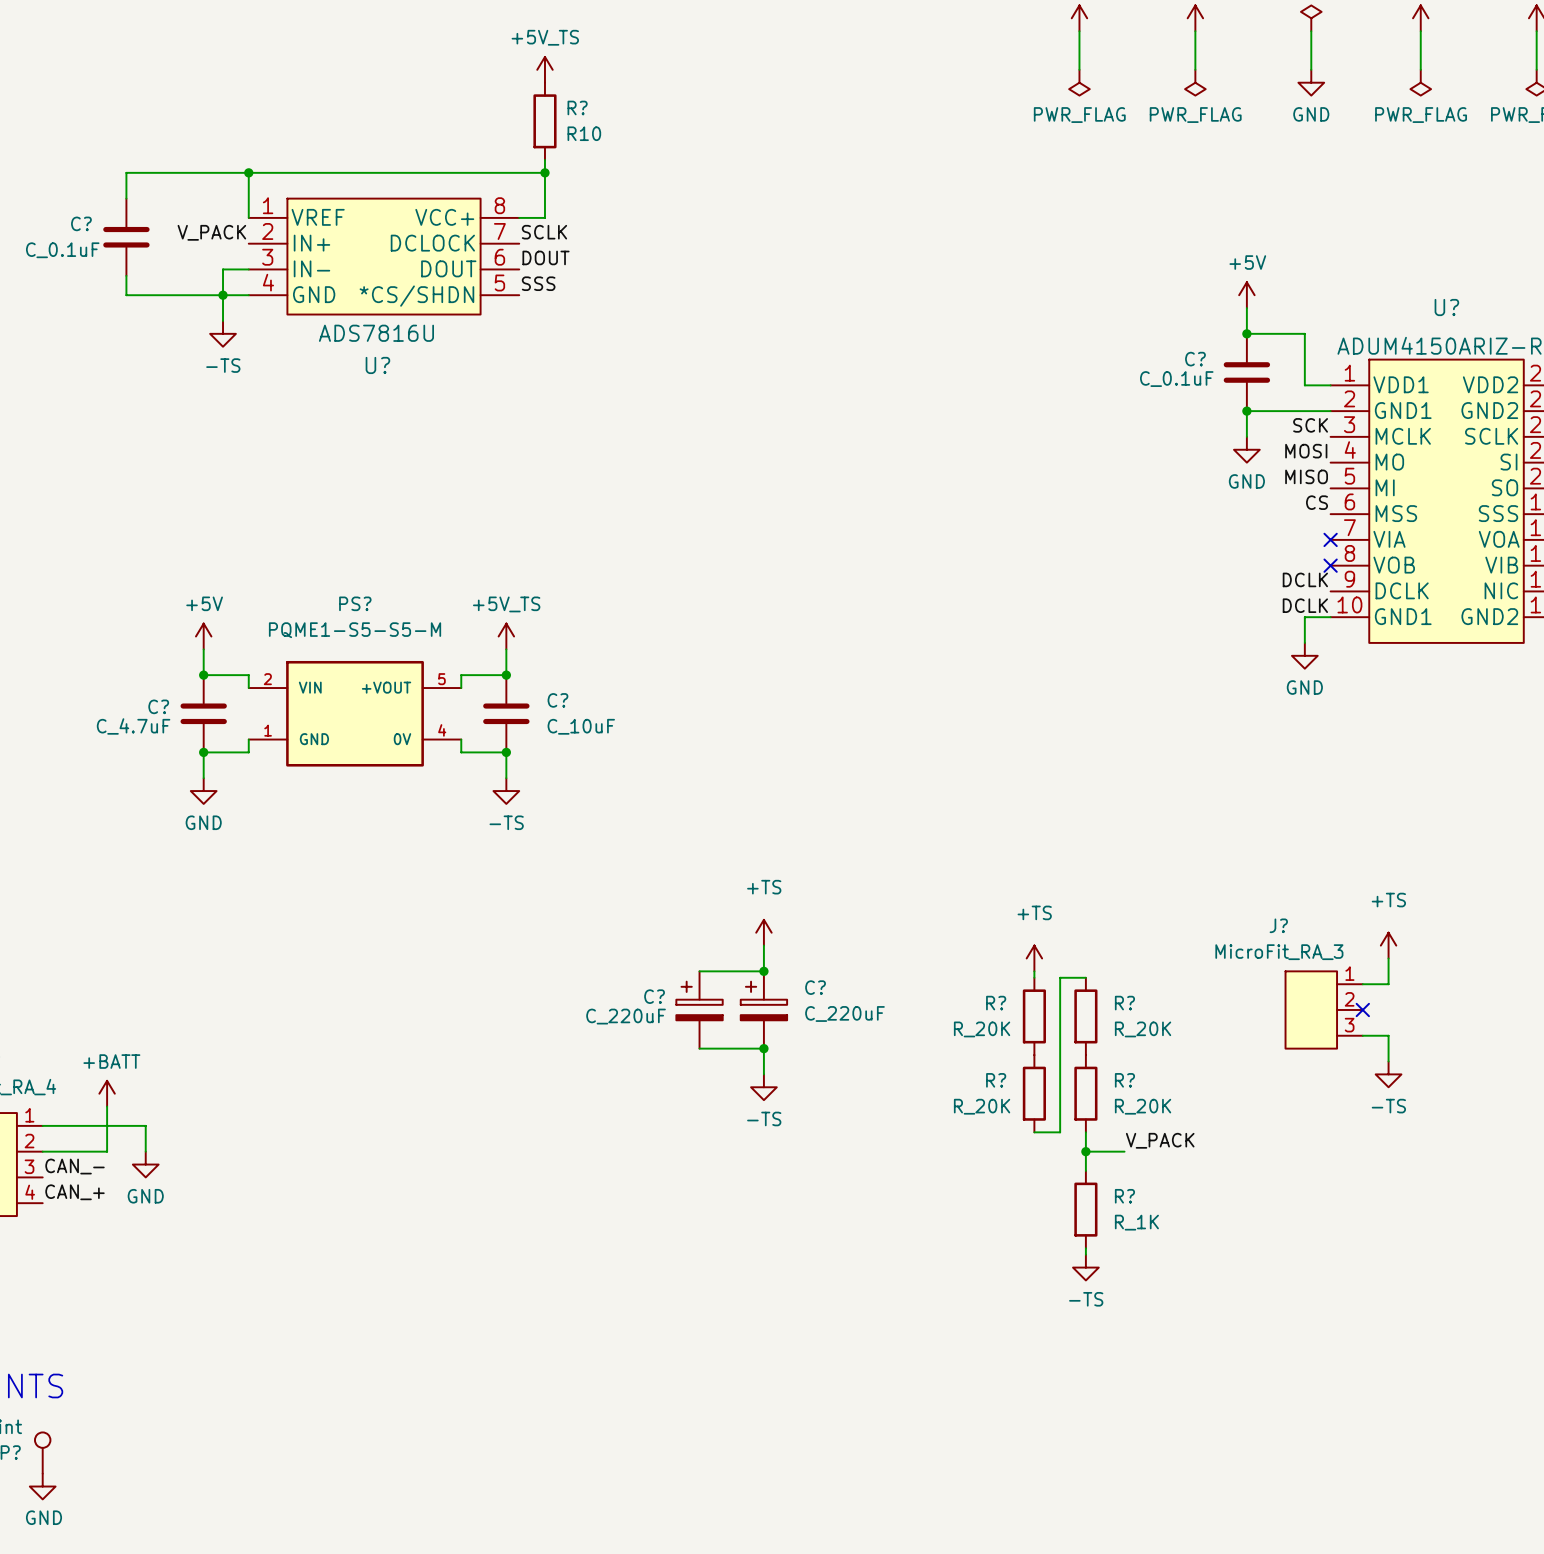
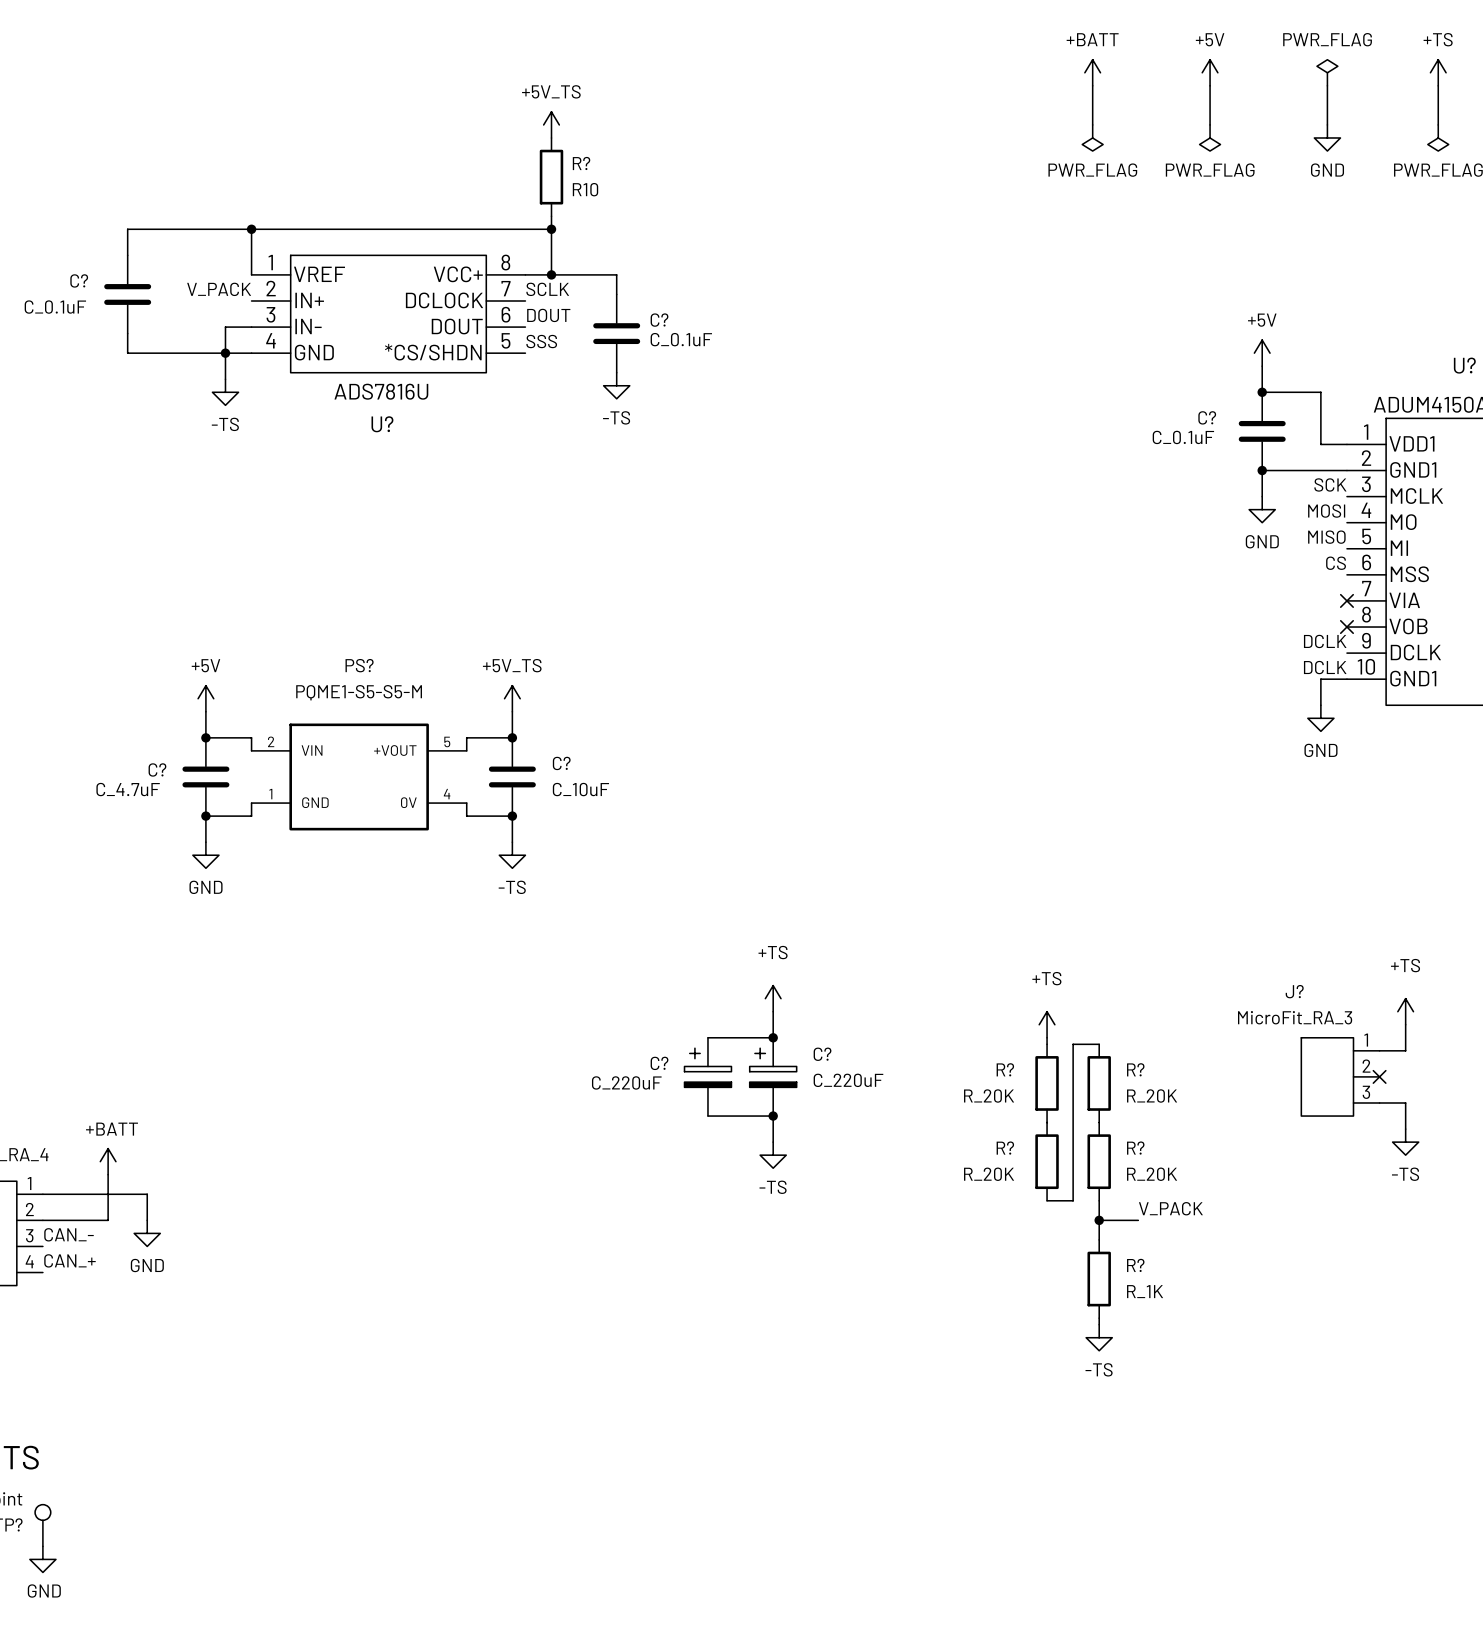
wire: none -> (551, 274) (616, 274) (616, 294)
junction: none -> (551, 274)
C?: none -> C_0.1uF (616, 333)
power symbol: none -> -TS (616, 385)

